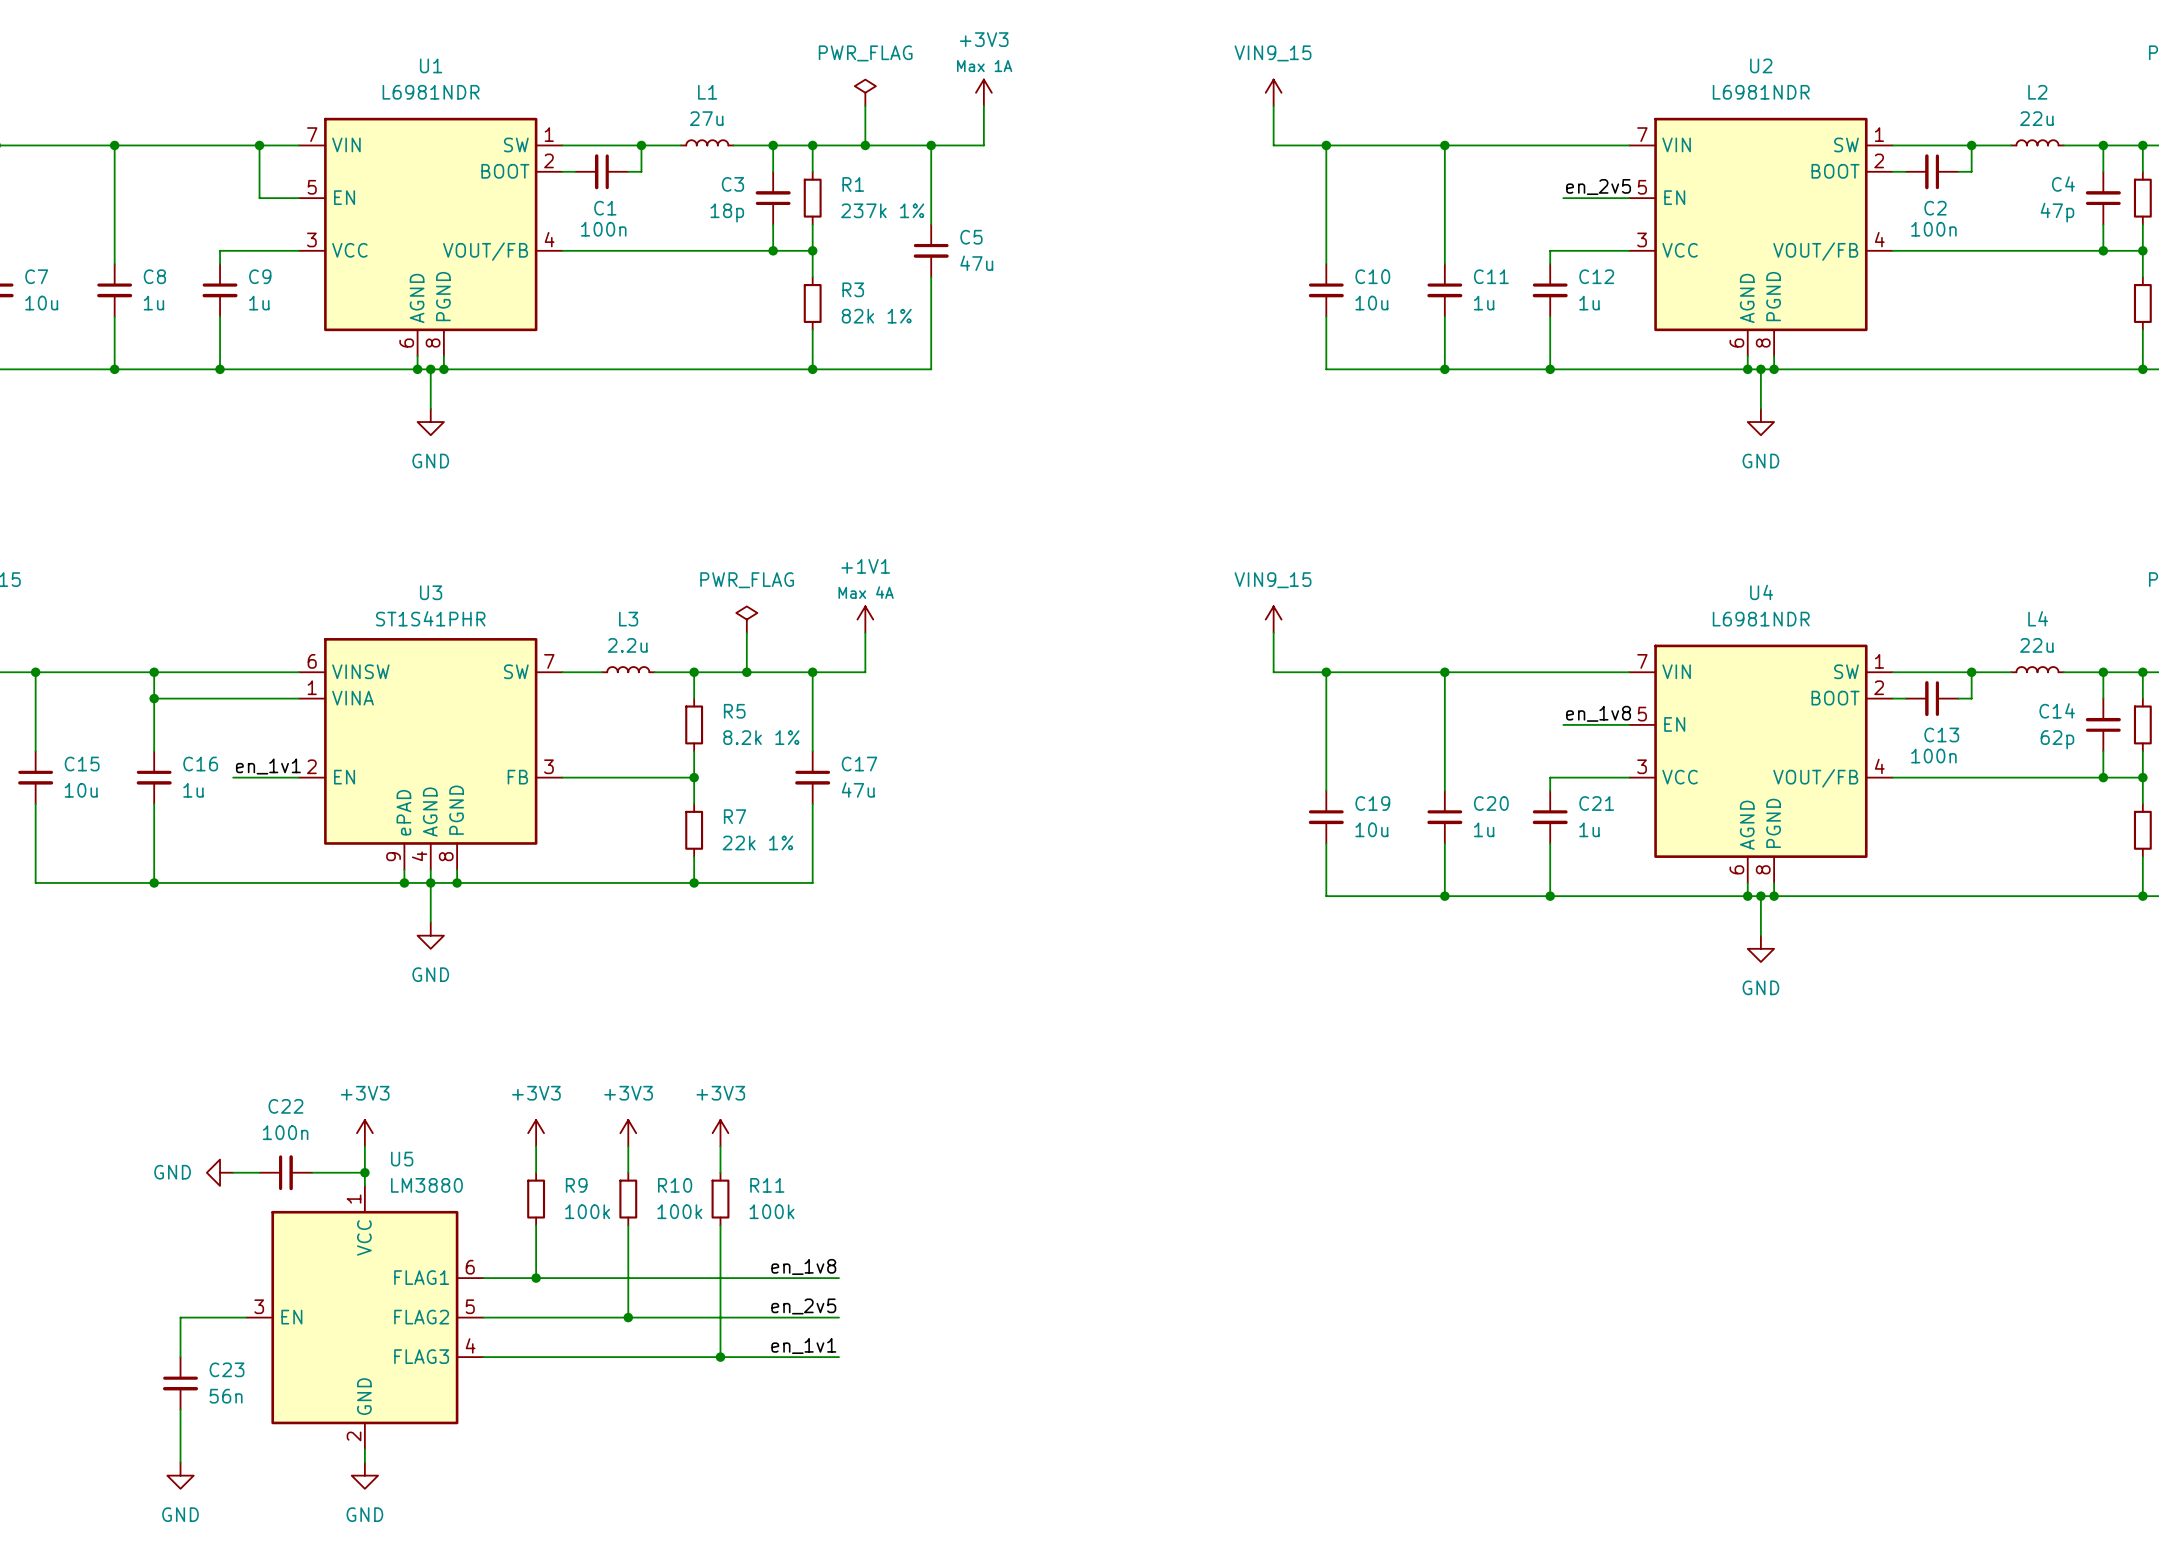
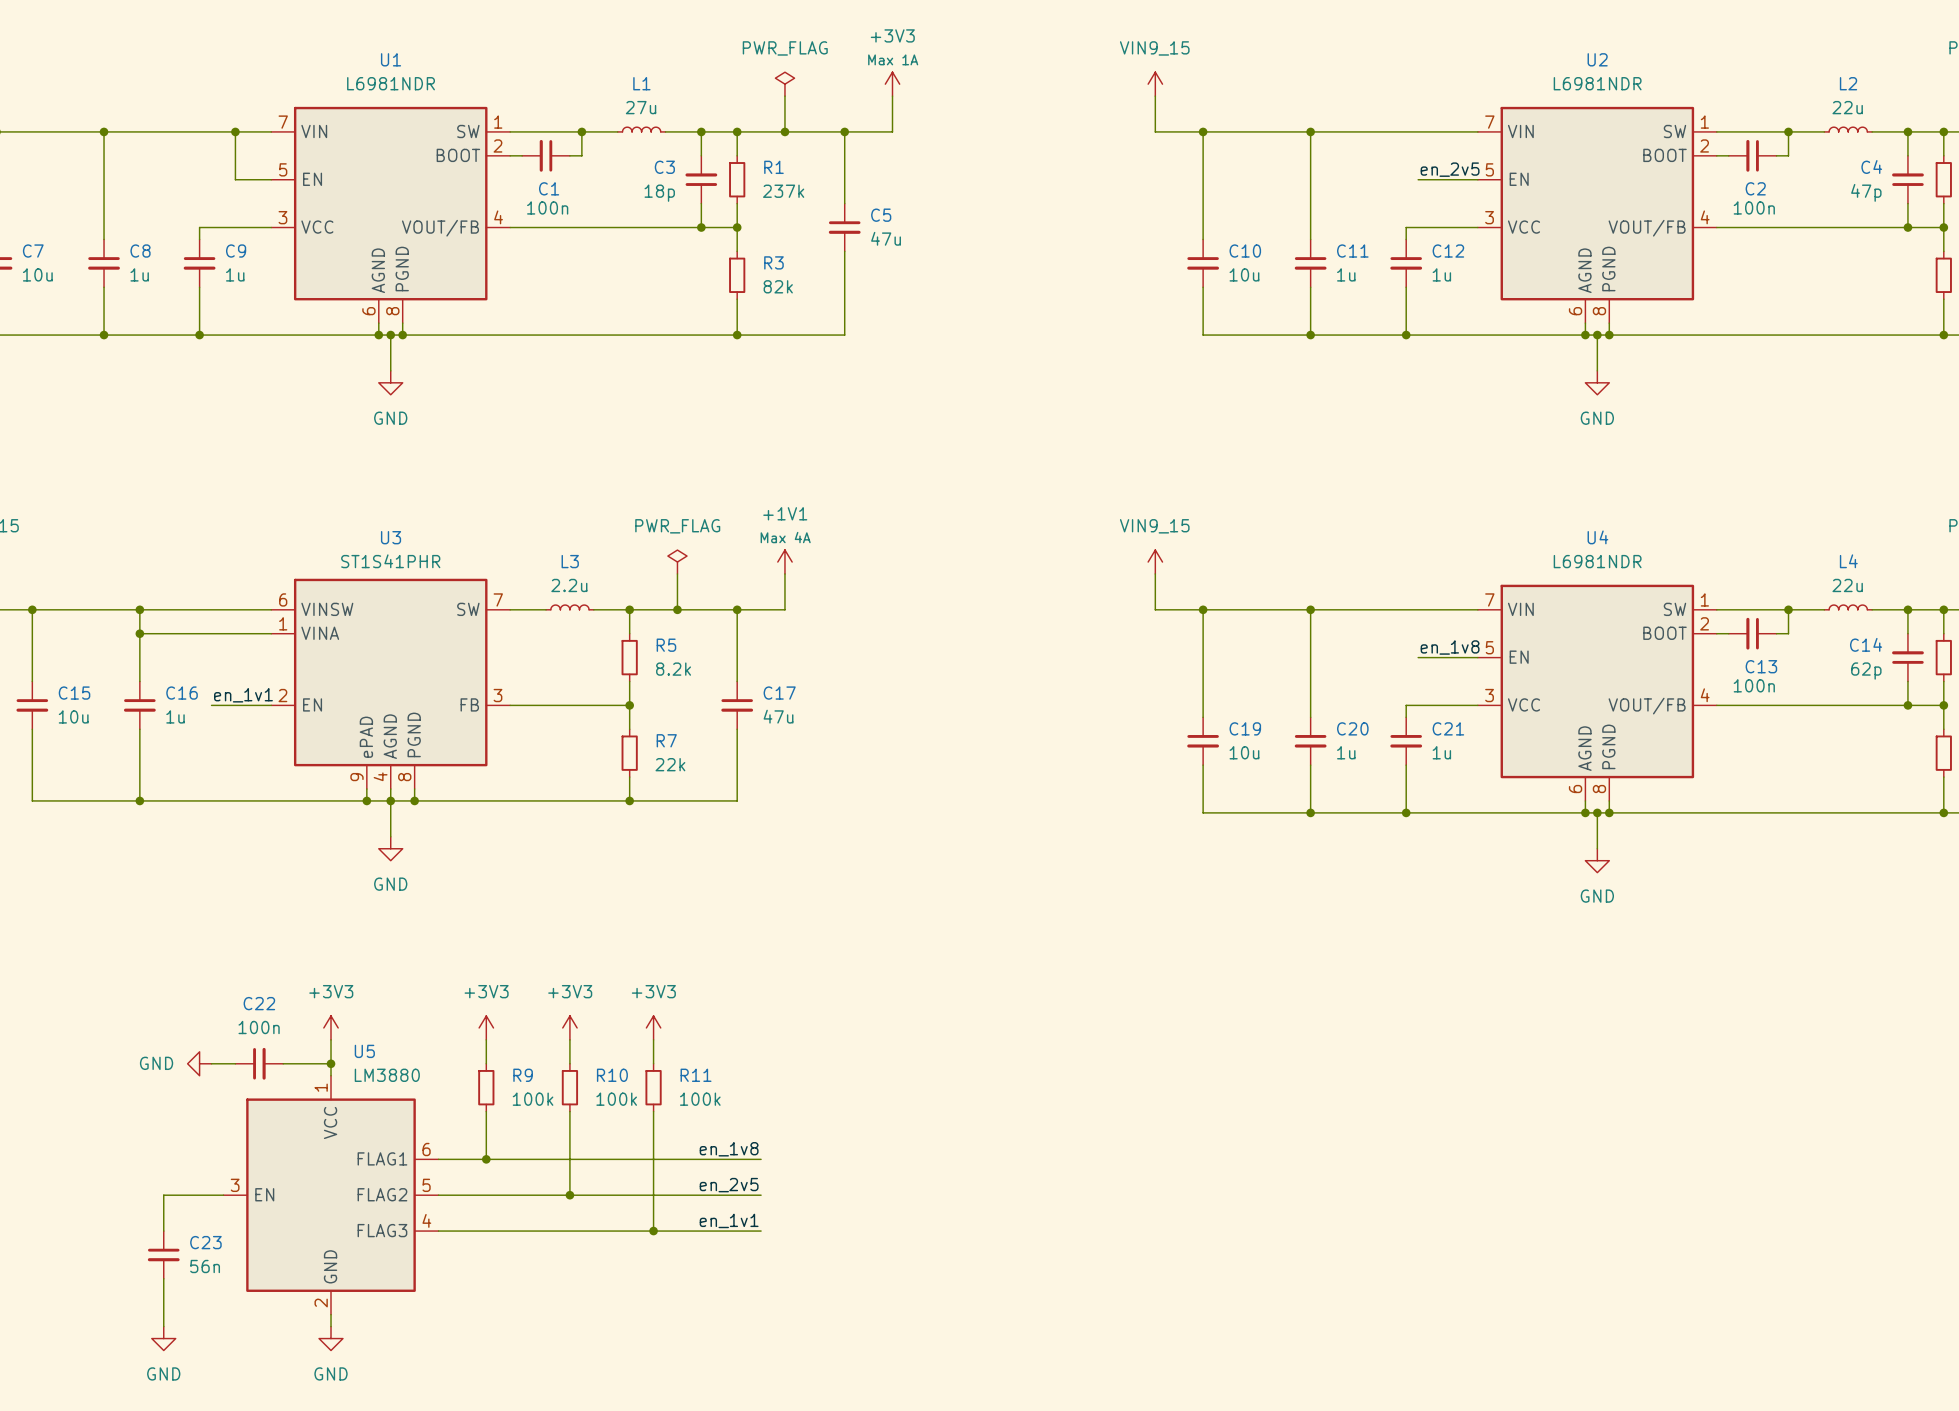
R1 value: 237k 1% (882, 210) -> 237k (783, 191)
R3 value: 82k 1% (876, 316) -> 82k (778, 286)
R5 value: 8.2k 1% (761, 737) -> 8.2k (673, 669)
R7 value: 22k 1% (757, 842) -> 22k (670, 764)

